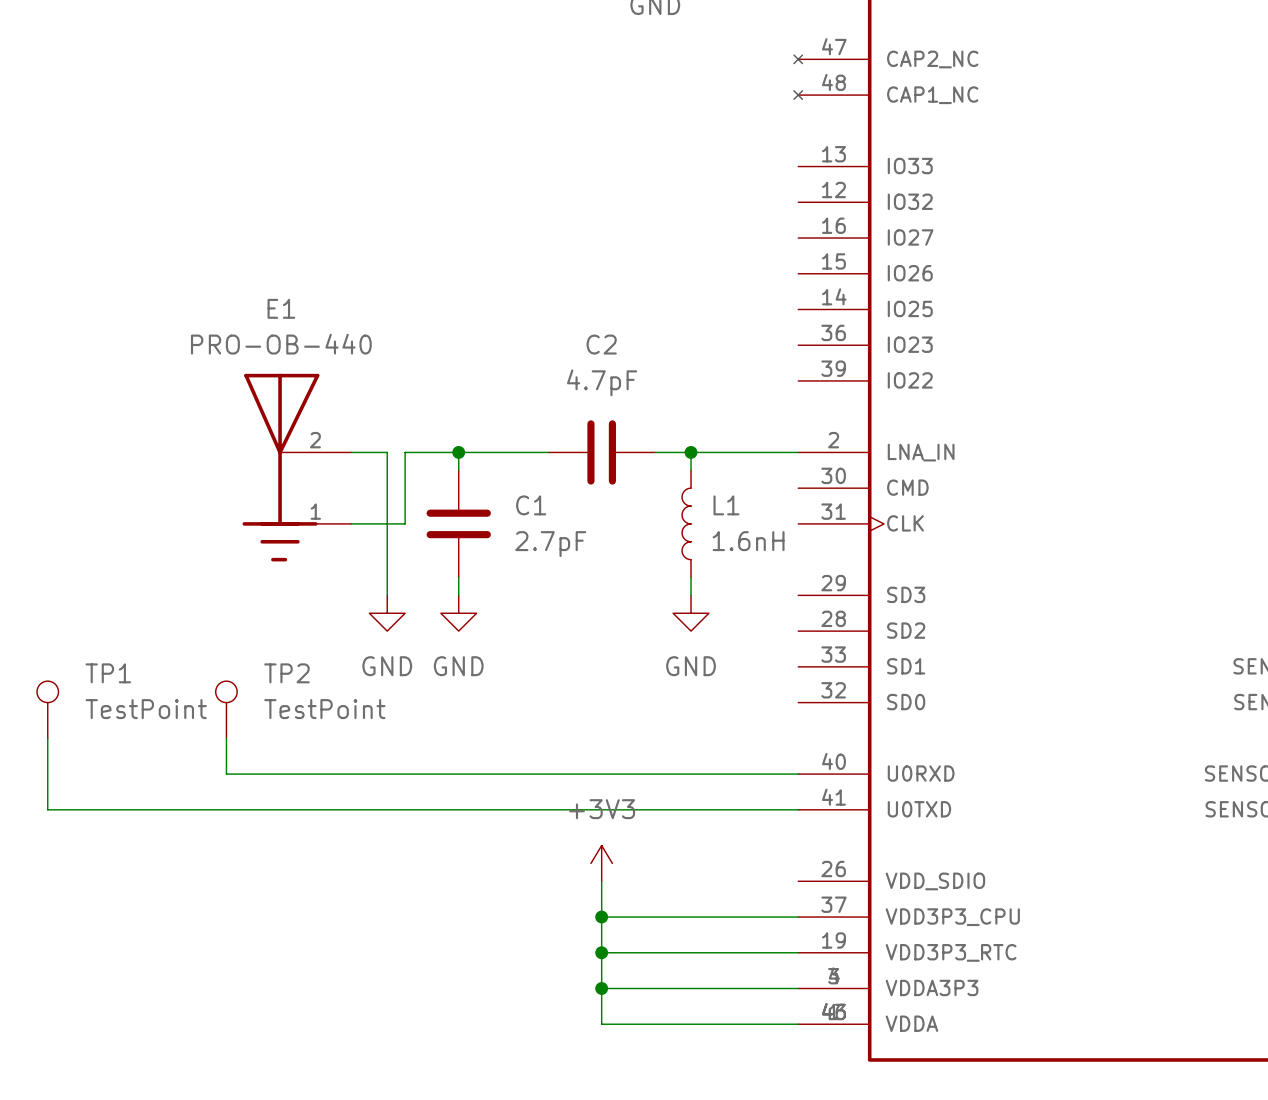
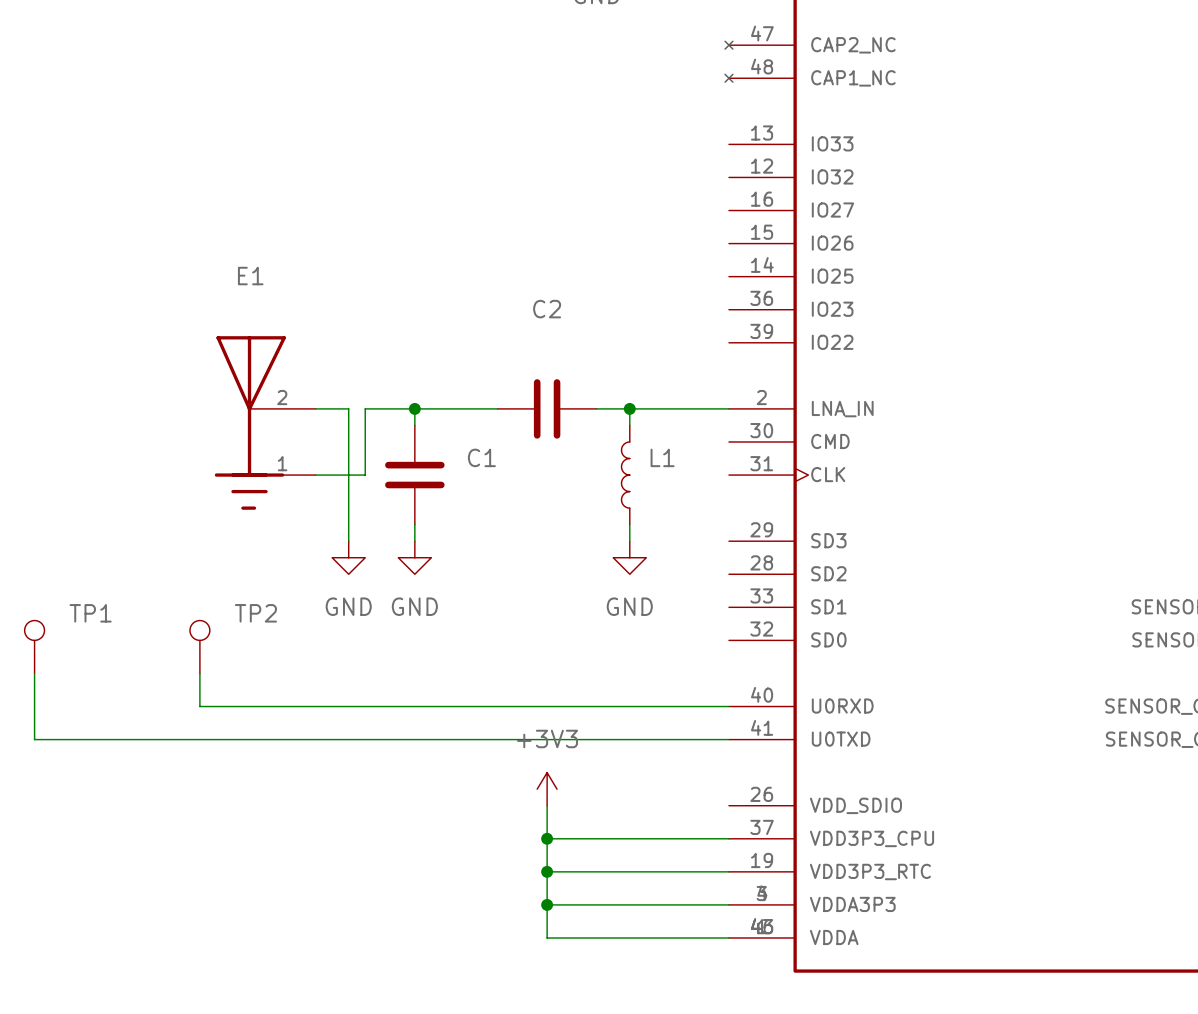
E1 value: PRO-OB-440 (281, 344) -> none
C2 value: 4.7pF (602, 382) -> none
L1 value: 1.6nH (748, 541) -> none
C1 value: 2.7pF (550, 544) -> none
TP1 value: TestPoint (146, 709) -> none
TP2 value: TestPoint (324, 709) -> none

